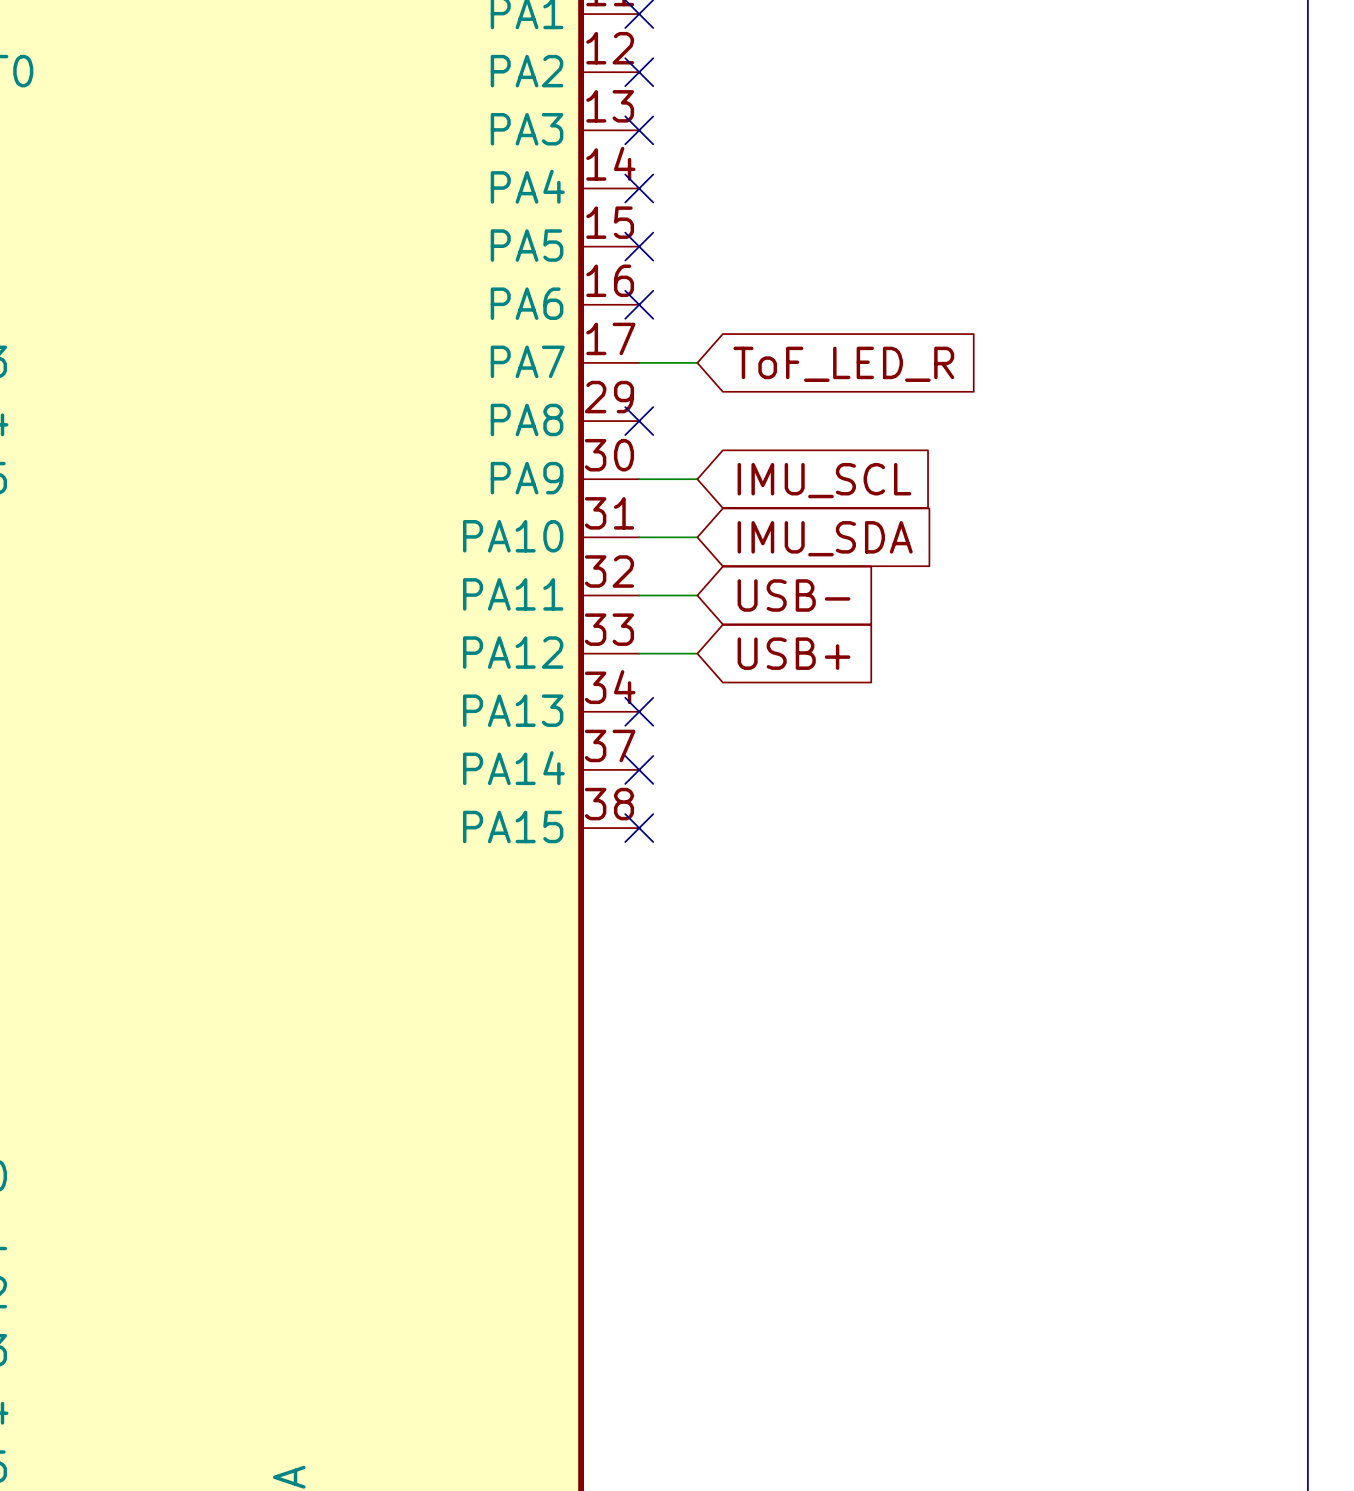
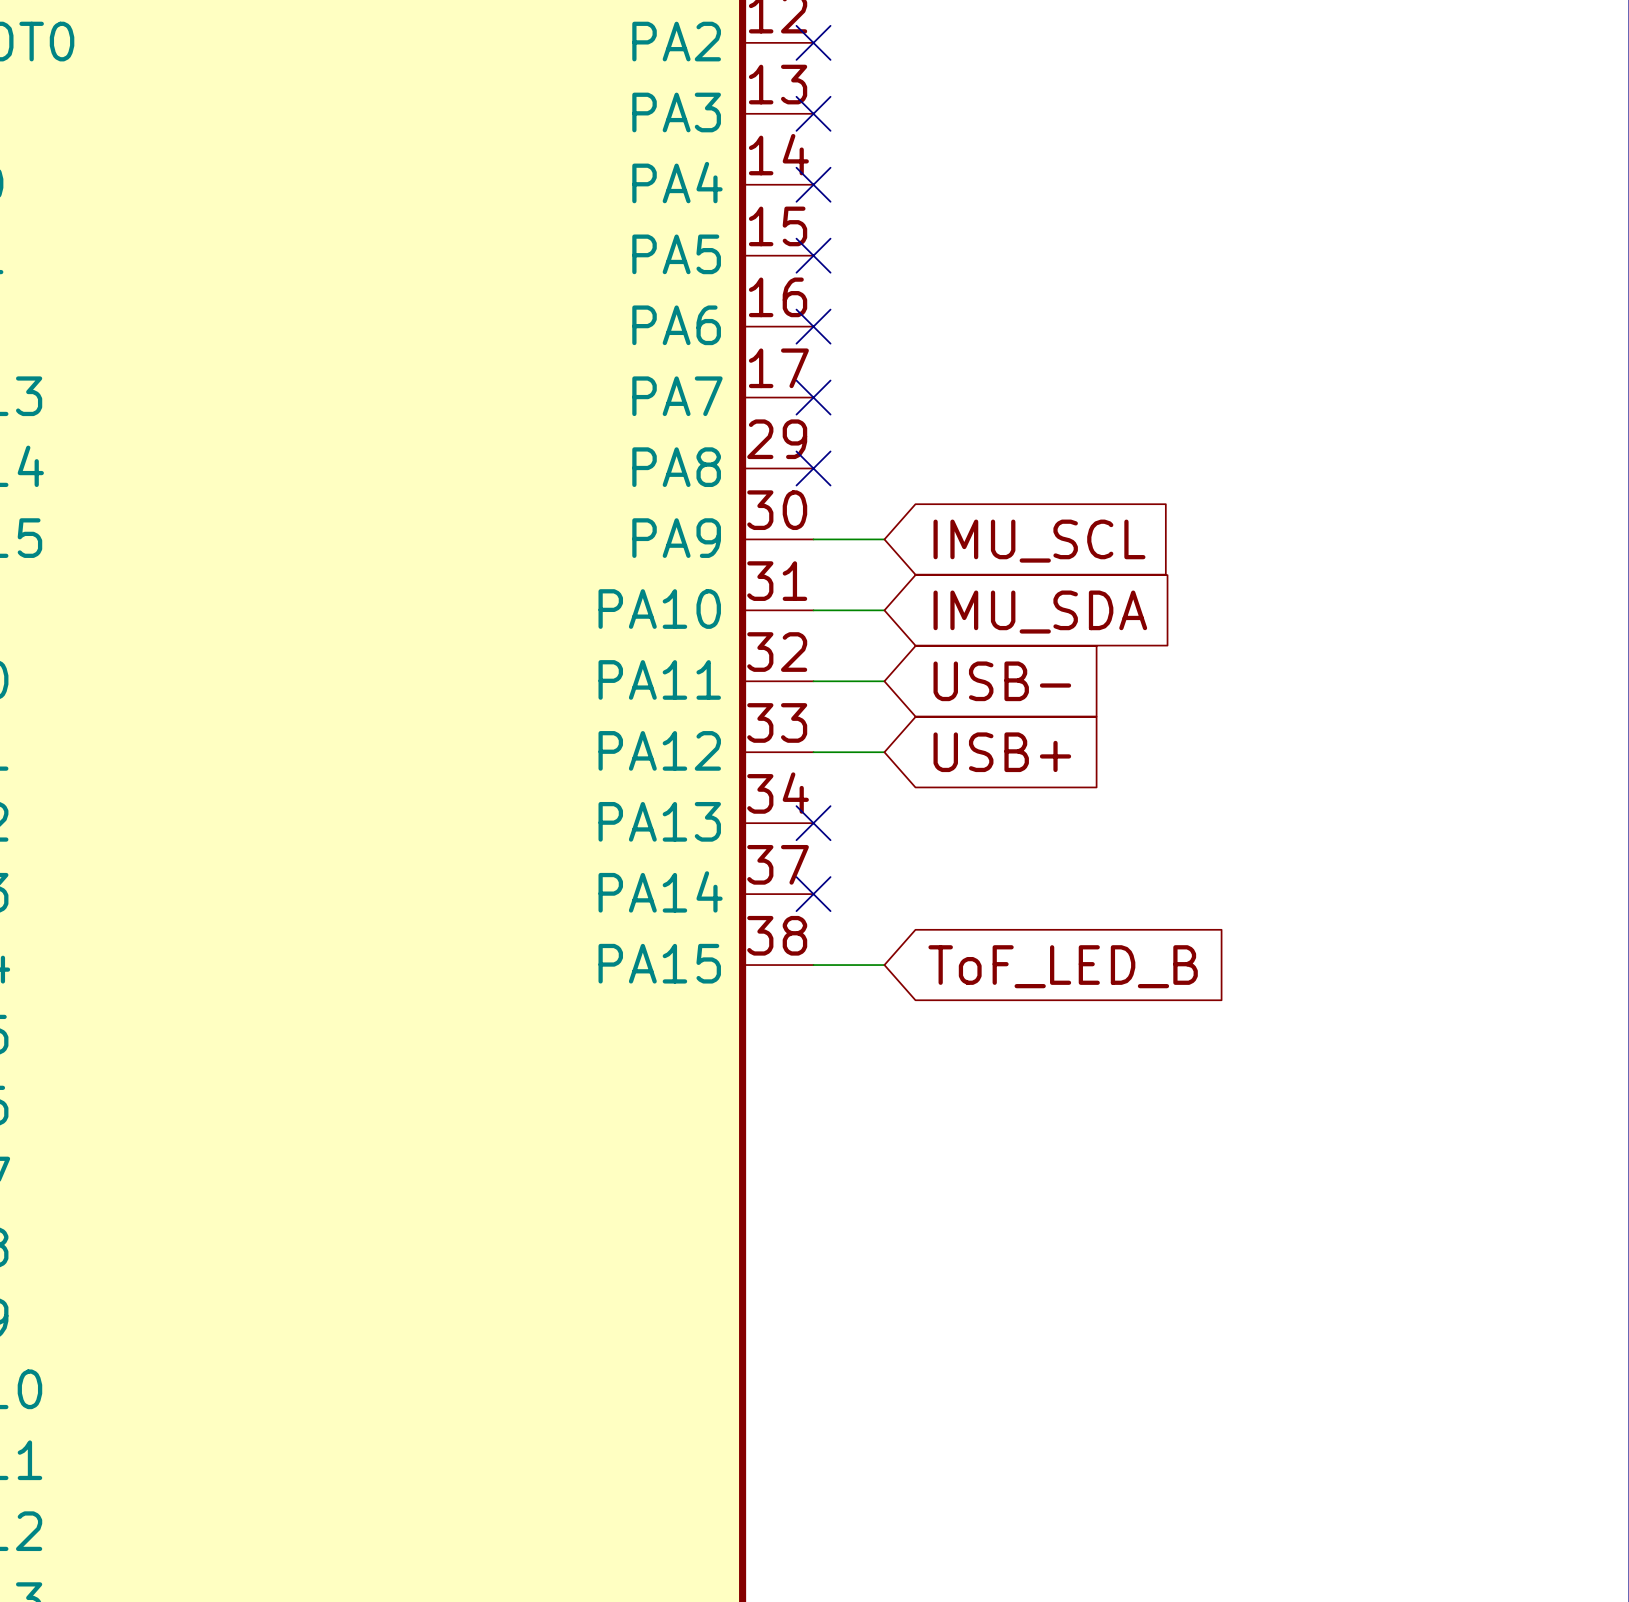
wire: (639, 362) (697, 362) -> (813, 965) (884, 965)
no-connect mark: none -> (813, 397)
global label: ToF_LED_R (843, 364) -> none
no-connect mark: (639, 828) -> none
global label: none -> ToF_LED_B (1063, 966)

